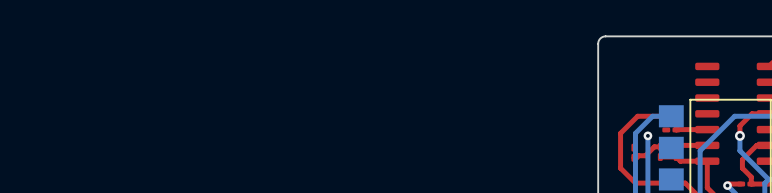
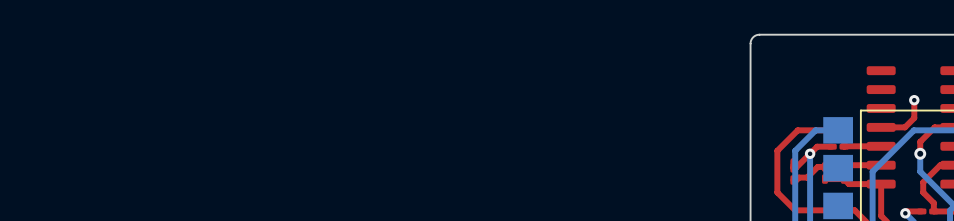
top track: none -> (914, 100) (914, 118) (904, 127) (881, 127)
via: none -> (914, 100)
top track: none -> (832, 146) (817, 146) (795, 167) (793, 167) (793, 160)

